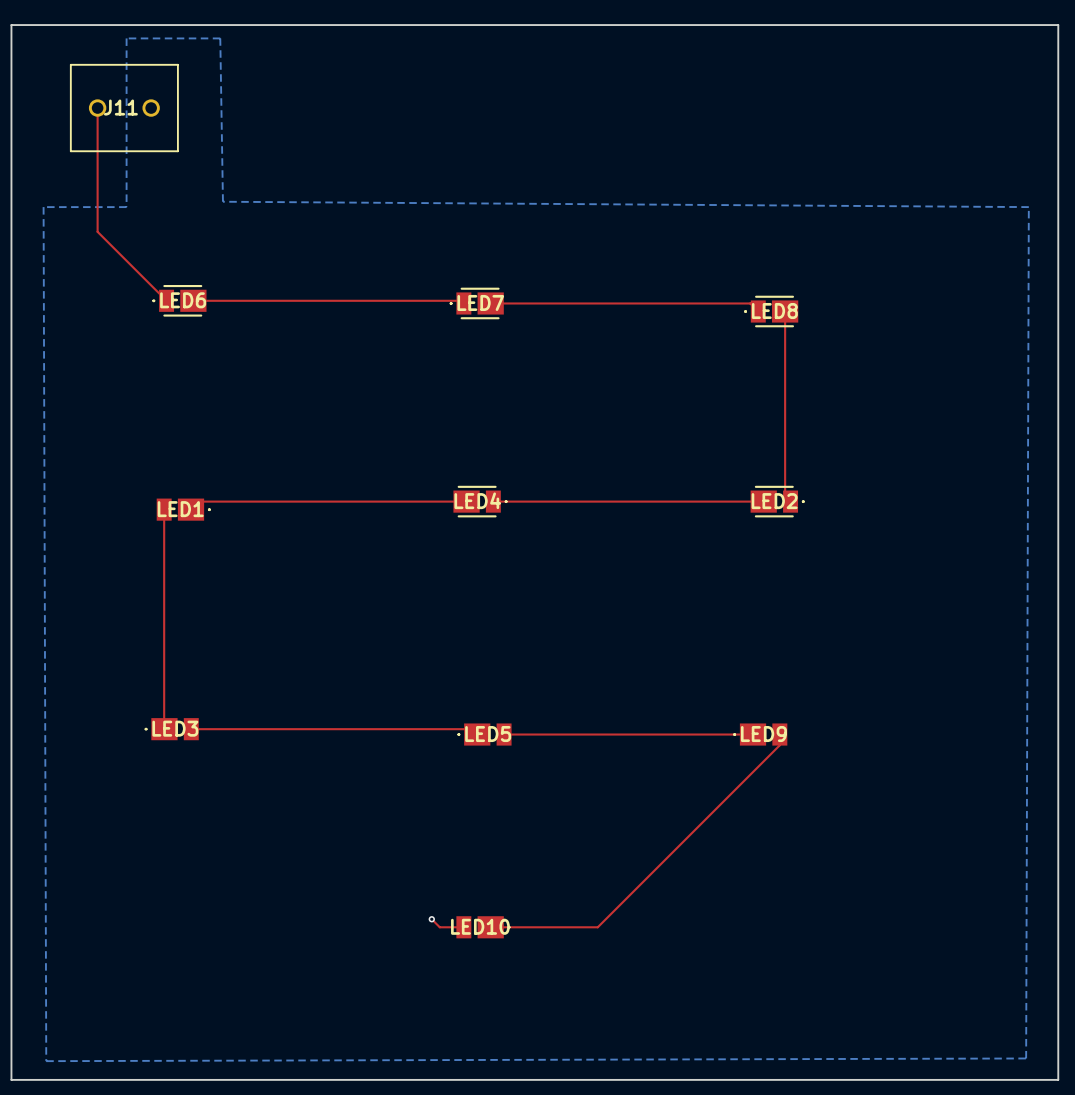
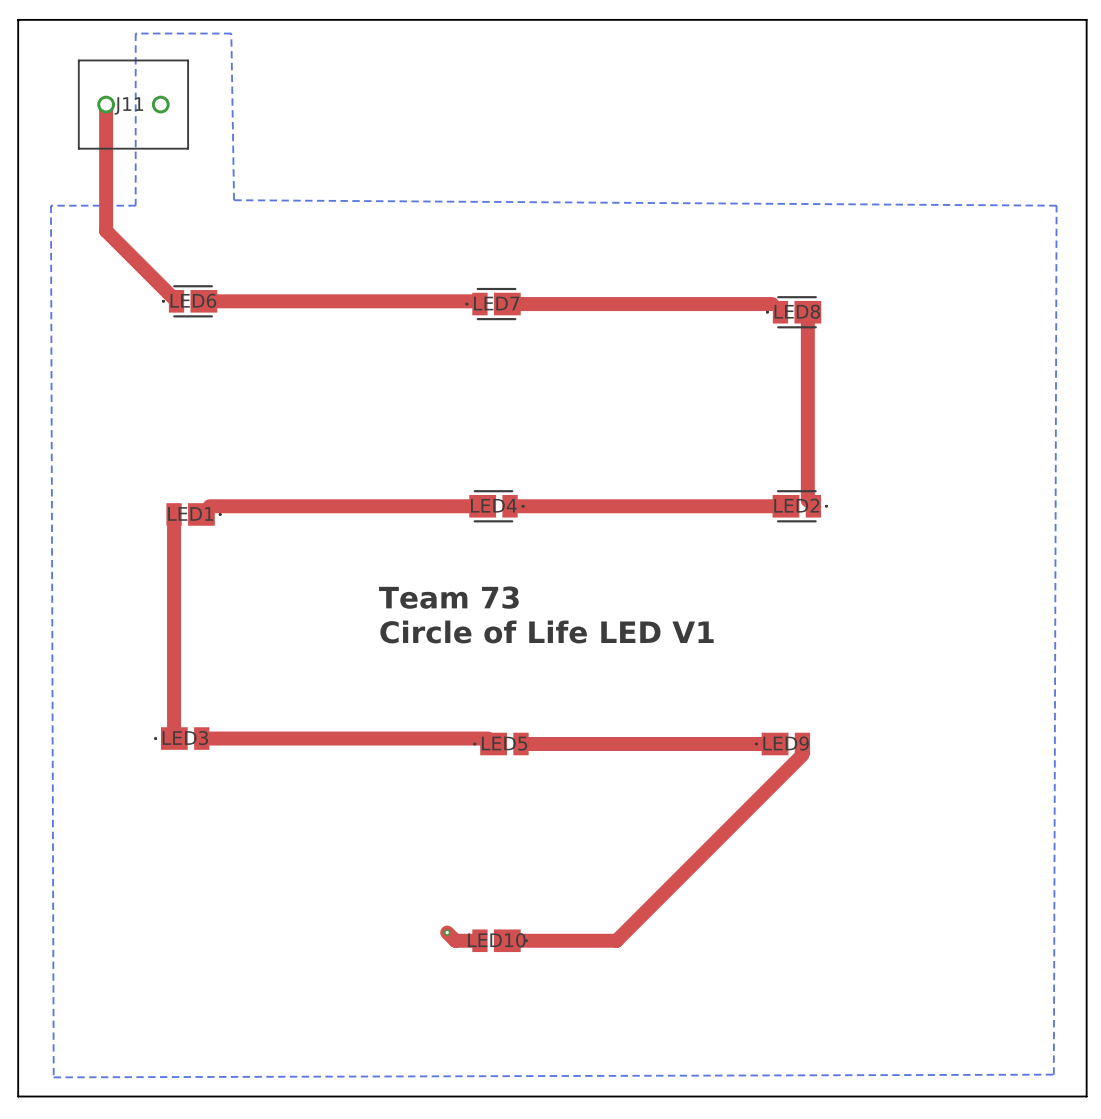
top track width: thin (97, 108) (97, 231) (166, 300) -> thick (106, 104) (106, 230) (176, 301)
top track width: thin (193, 300) (461, 300) -> thick (203, 301) (477, 301)
top track width: thin (490, 303) (750, 303) -> thick (507, 304) (772, 304)
top track width: thin (785, 311) (785, 496) -> thick (807, 312) (807, 500)
top track width: thin (199, 501) (466, 501) -> thick (209, 506) (482, 506)
top track width: thin (493, 501) (763, 501) -> thick (510, 506) (785, 506)
top track width: thin (164, 509) (164, 728) -> thick (174, 514) (174, 738)
text: none -> Team 73 (448, 597)
text: none -> Circle of Life LED V1 (547, 631)
top track width: thin (191, 729) (471, 729) -> thick (201, 738) (488, 738)
top track width: thin (504, 734) (753, 734) -> thick (520, 744) (775, 744)
top track width: thin (779, 745) (597, 927) (490, 927) -> thick (802, 754) (616, 940) (507, 940)
top track width: thin (431, 919) (439, 927) (463, 927) -> thick (447, 932) (455, 940) (479, 940)

